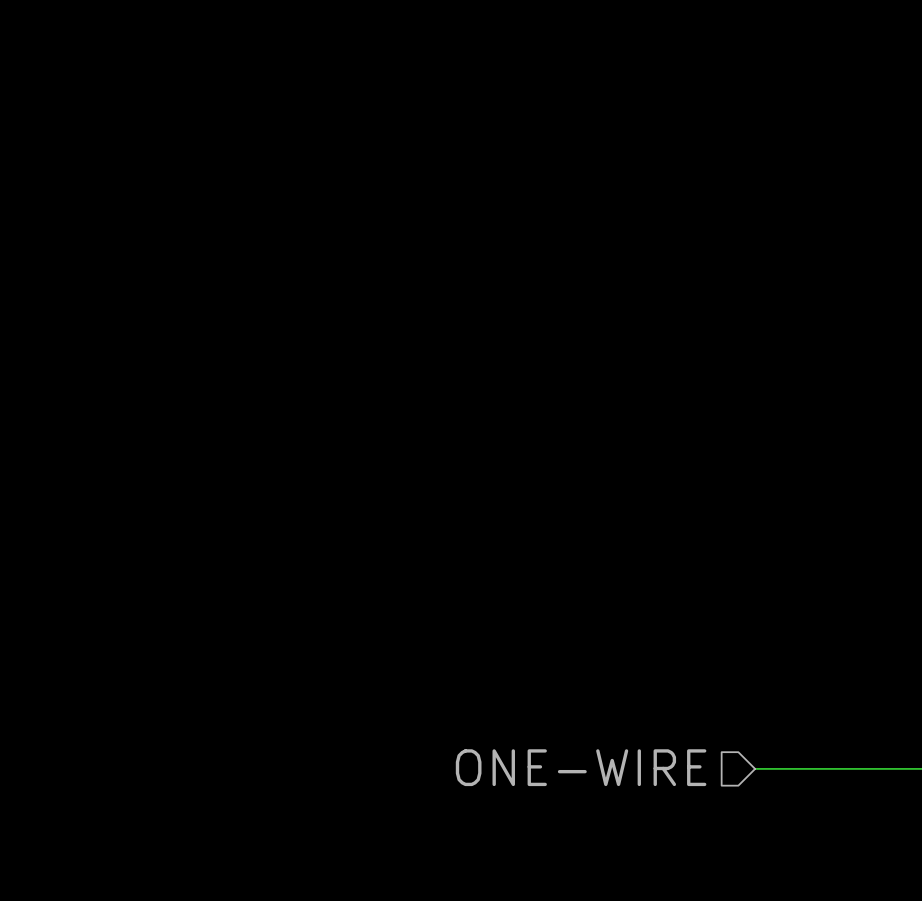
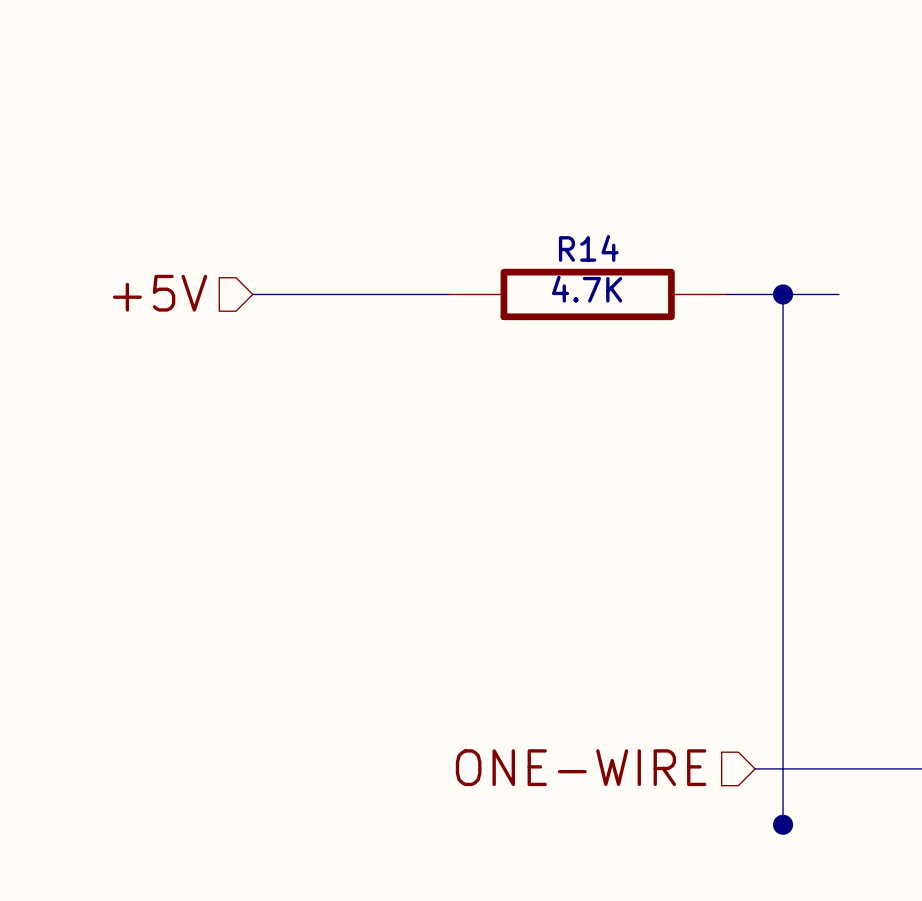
hierarchical label: none -> +5V (160, 293)
wire: none -> (252, 294) (448, 294)
R14: none -> 4.7K (587, 294)
wire: none -> (727, 294) (838, 294)
wire: none -> (783, 294) (783, 824)
junction: none -> (783, 294)
junction: none -> (783, 824)

